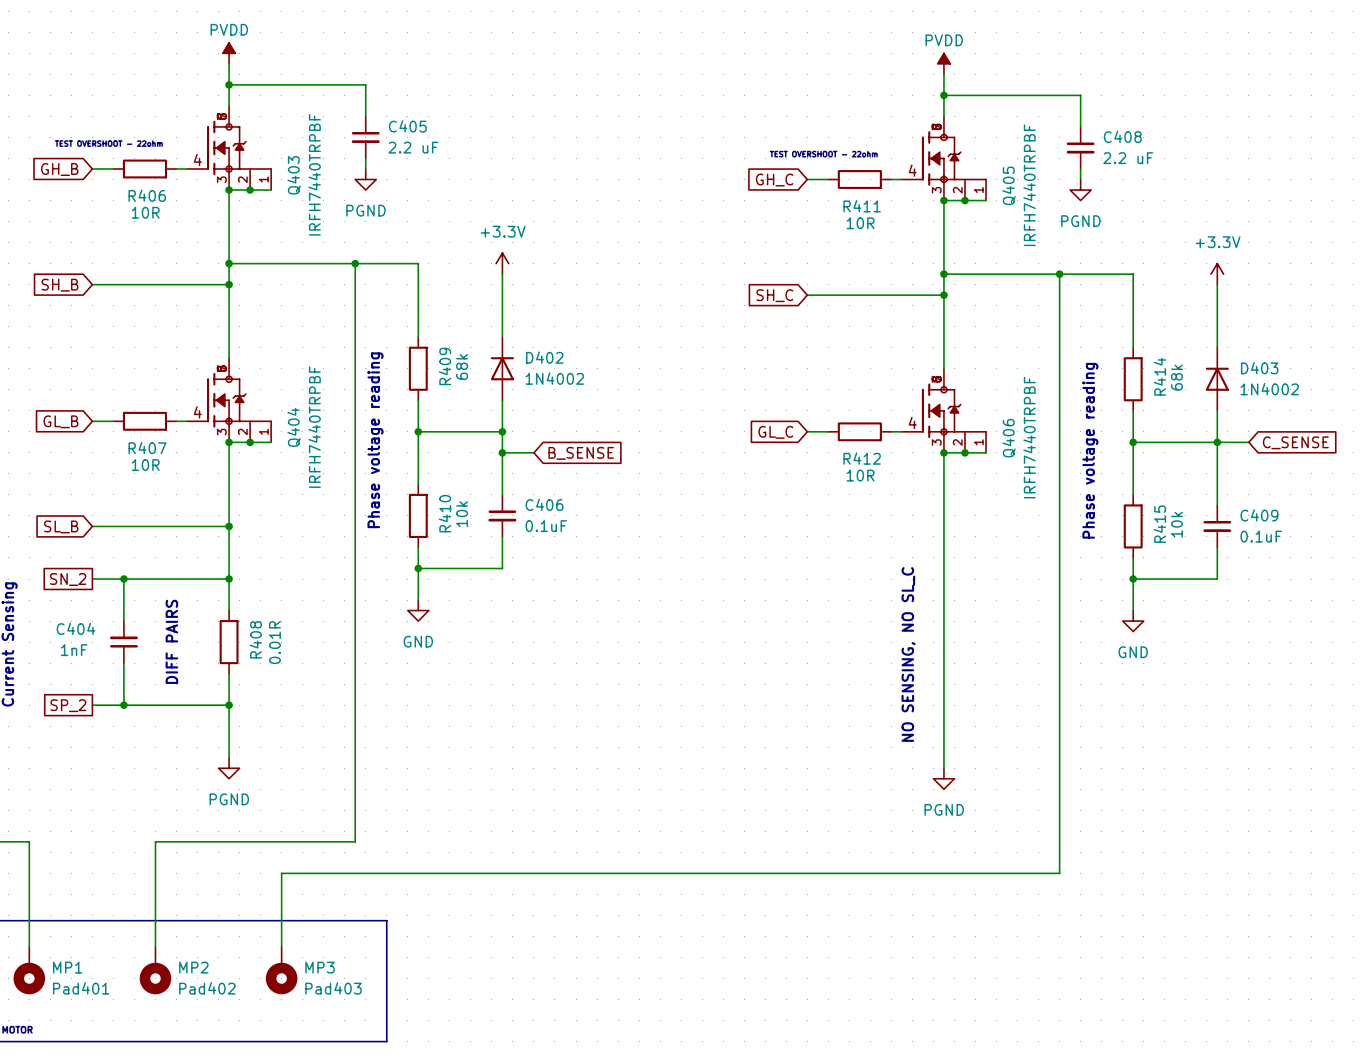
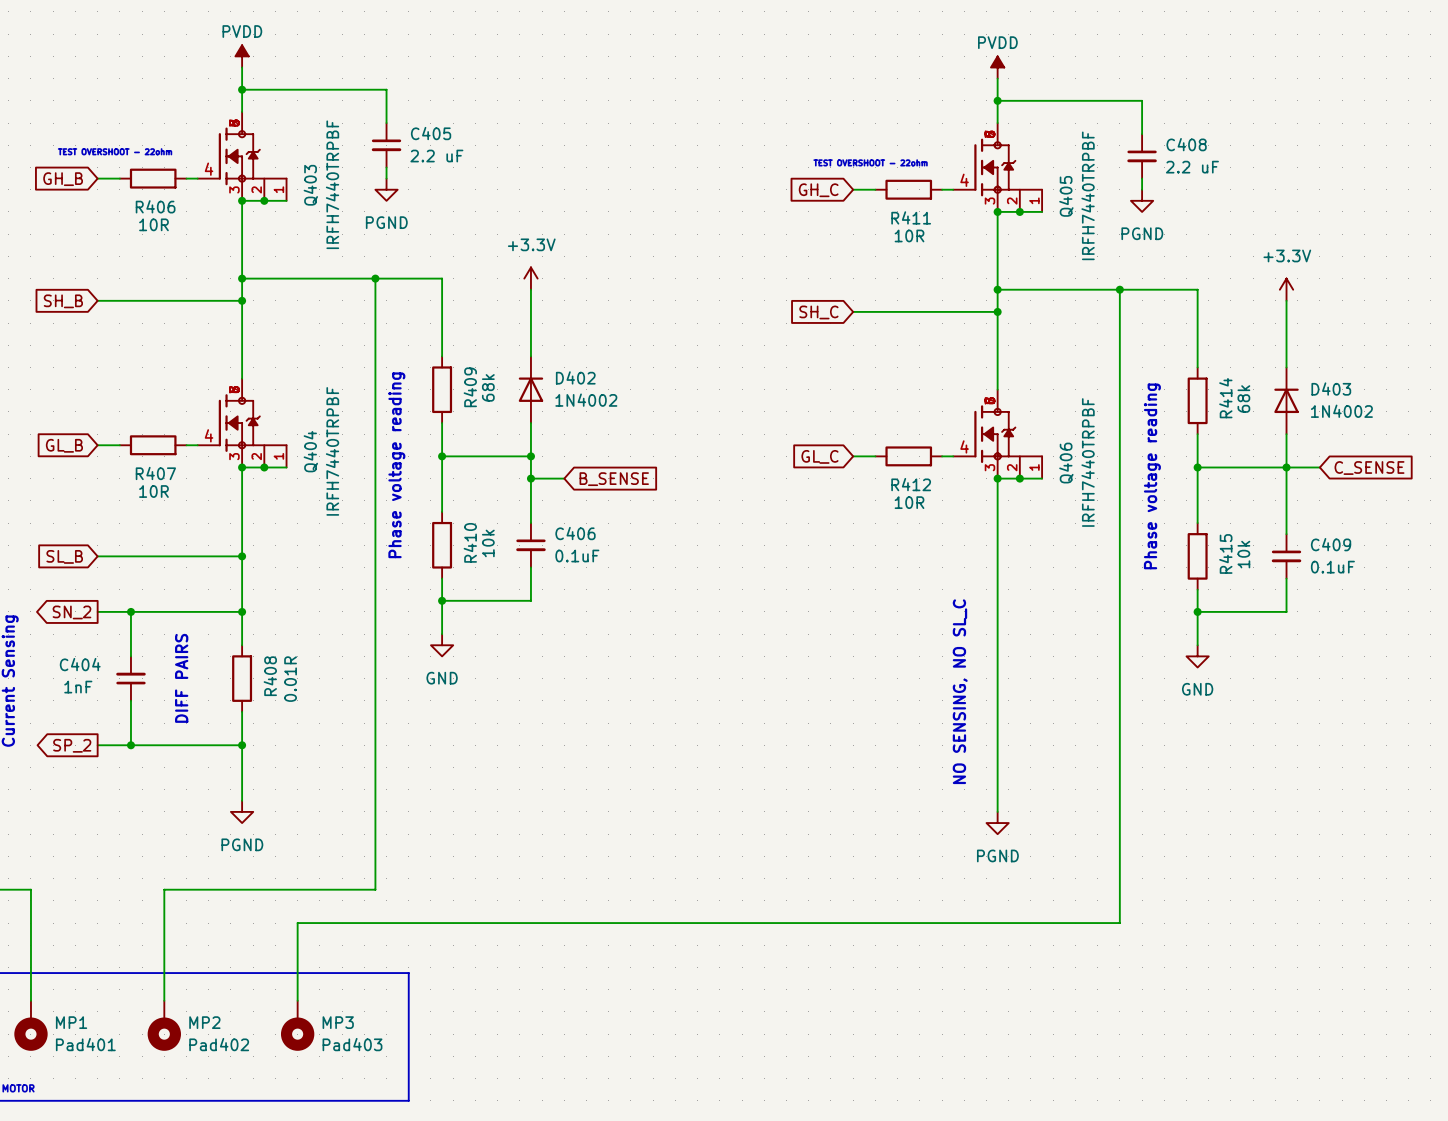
global label shape: passive (68, 579) -> output (71, 612)
global label shape: passive (68, 705) -> output (72, 745)

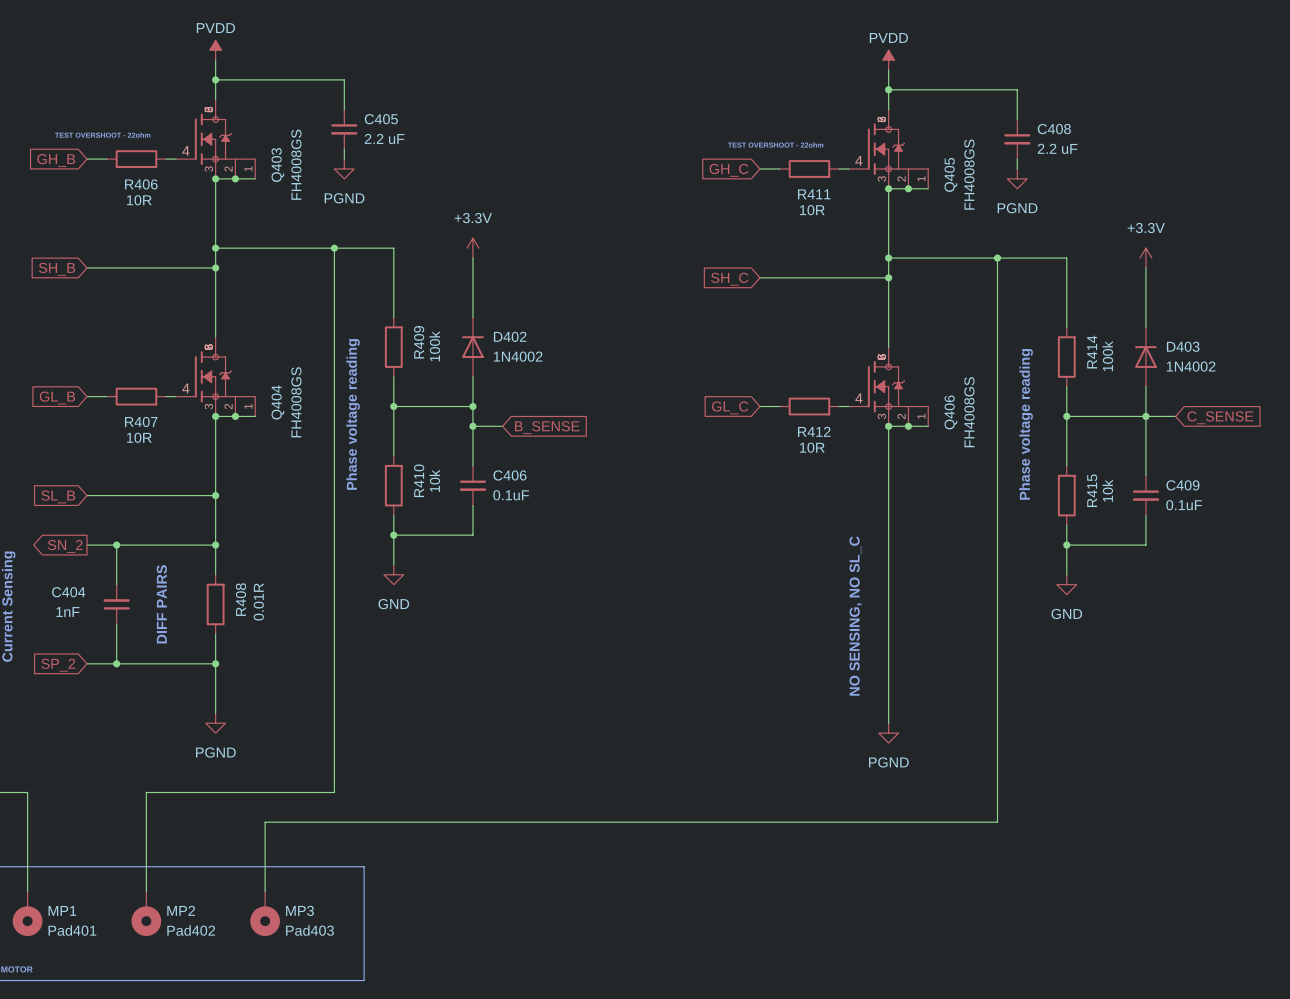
Q403 value: IRFH7440TRPBF (332, 184) -> FH4008GS (296, 164)
Q405 value: IRFH7440TRPBF (1088, 195) -> FH4008GS (969, 174)
R409 value: 68k (488, 387) -> 100k (434, 346)
R414 value: 68k (1243, 399) -> 100k (1107, 356)
Q404 value: IRFH7440TRPBF (332, 451) -> FH4008GS (296, 402)
Q406 value: IRFH7440TRPBF (1088, 462) -> FH4008GS (969, 412)
global label shape: output (72, 745) -> input (58, 665)

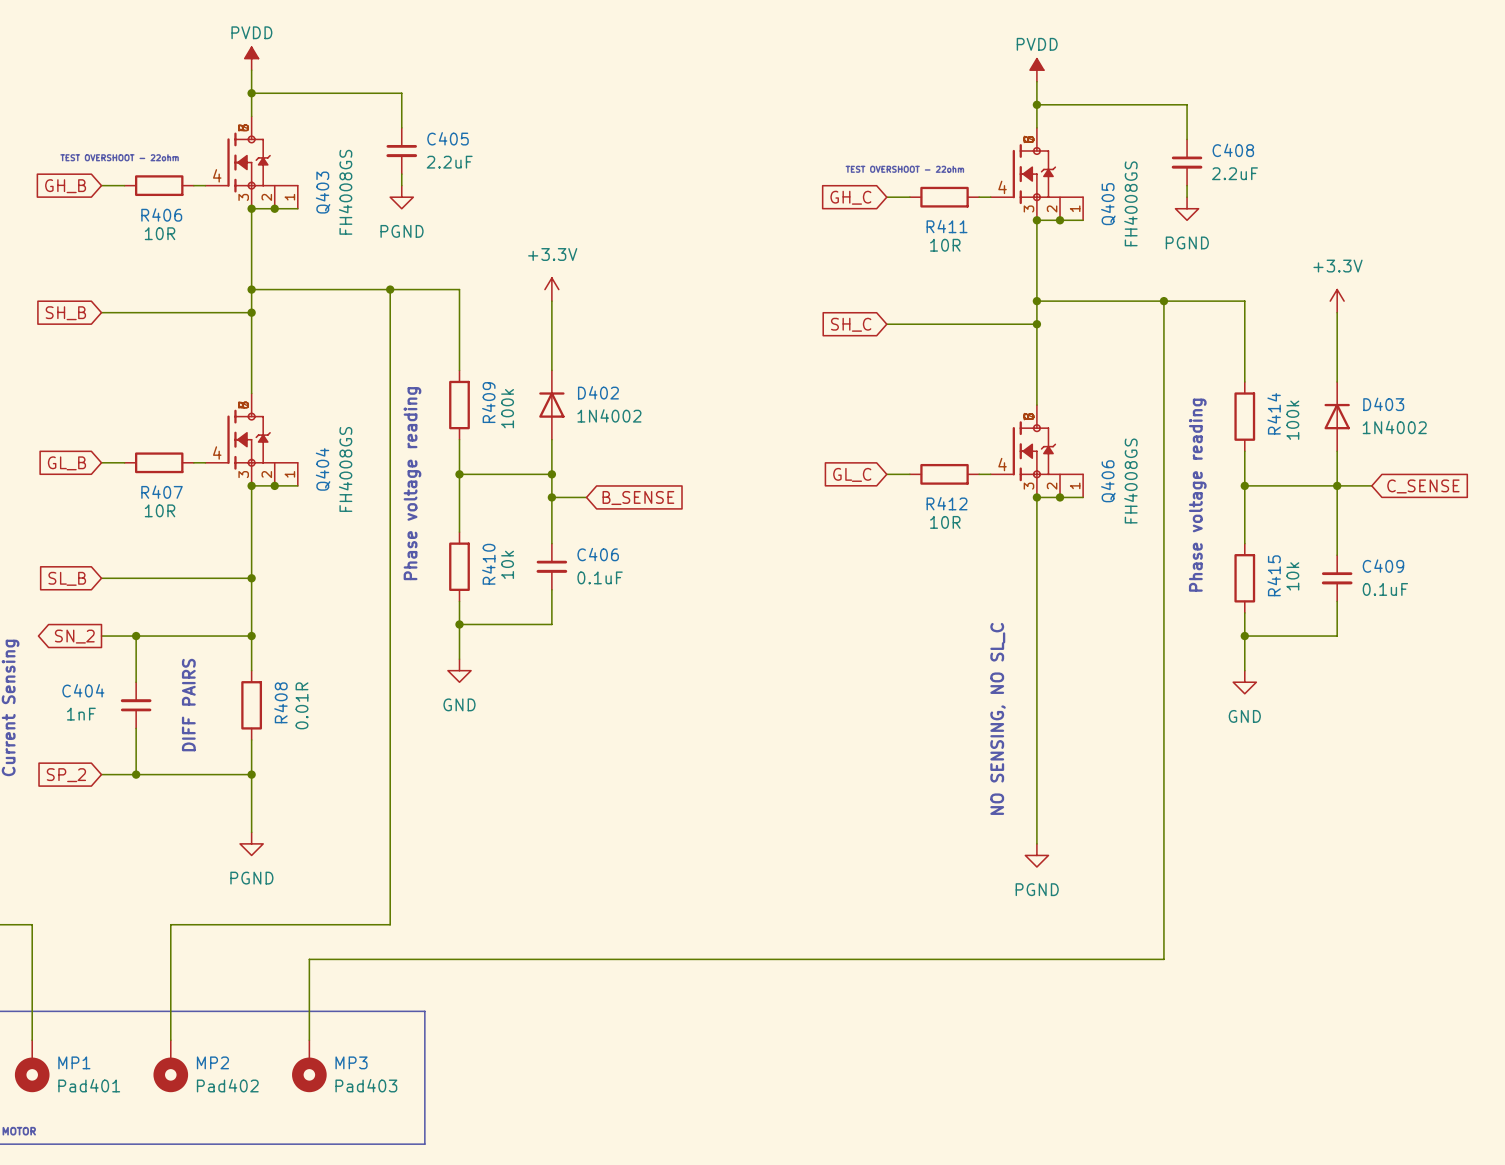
C405 value: 2.2 uF (384, 138) -> 2.2uF (449, 162)
C408 value: 2.2 uF (1057, 148) -> 2.2uF (1234, 173)

